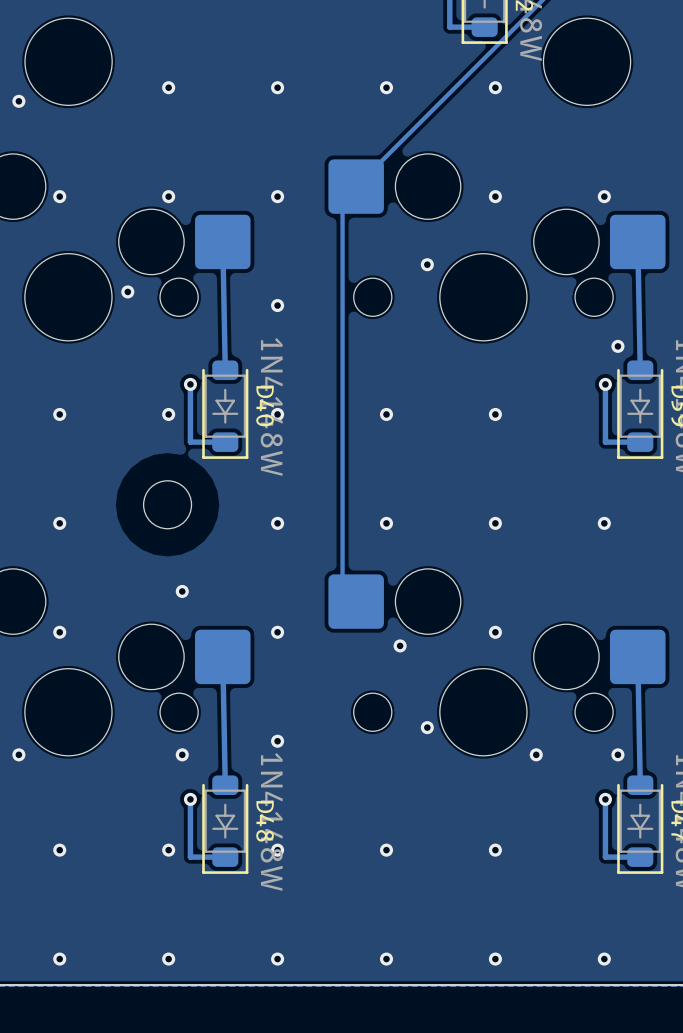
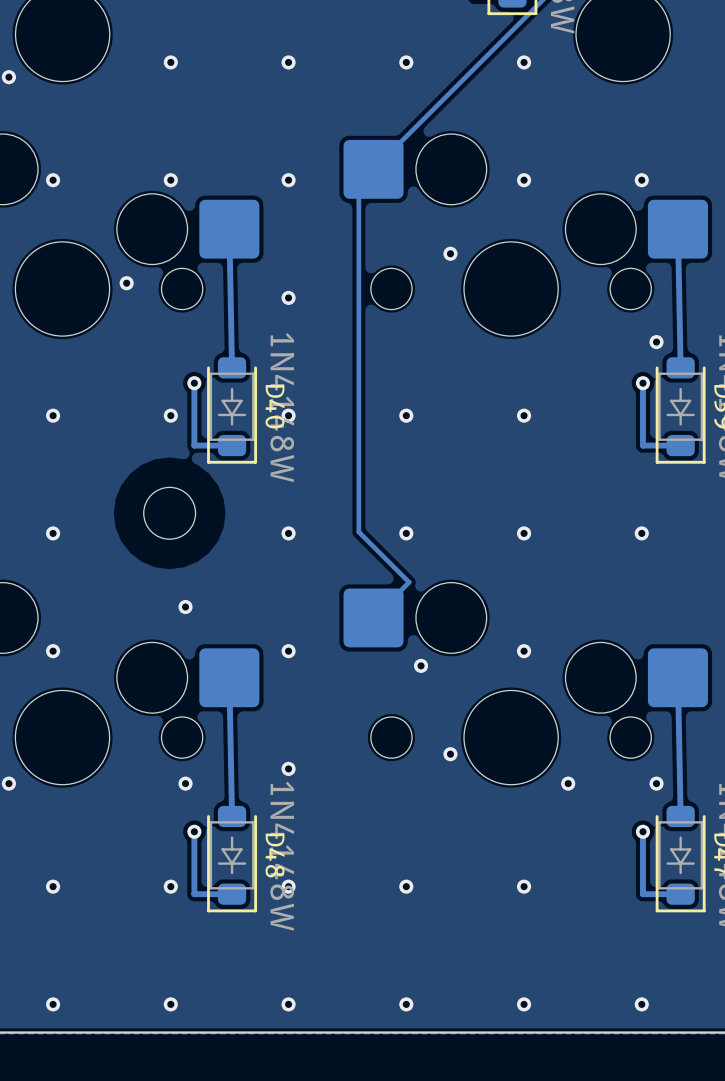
track: (342, 200) (342, 587) (356, 601) -> (358, 184) (358, 532) (409, 582) (373, 617)

